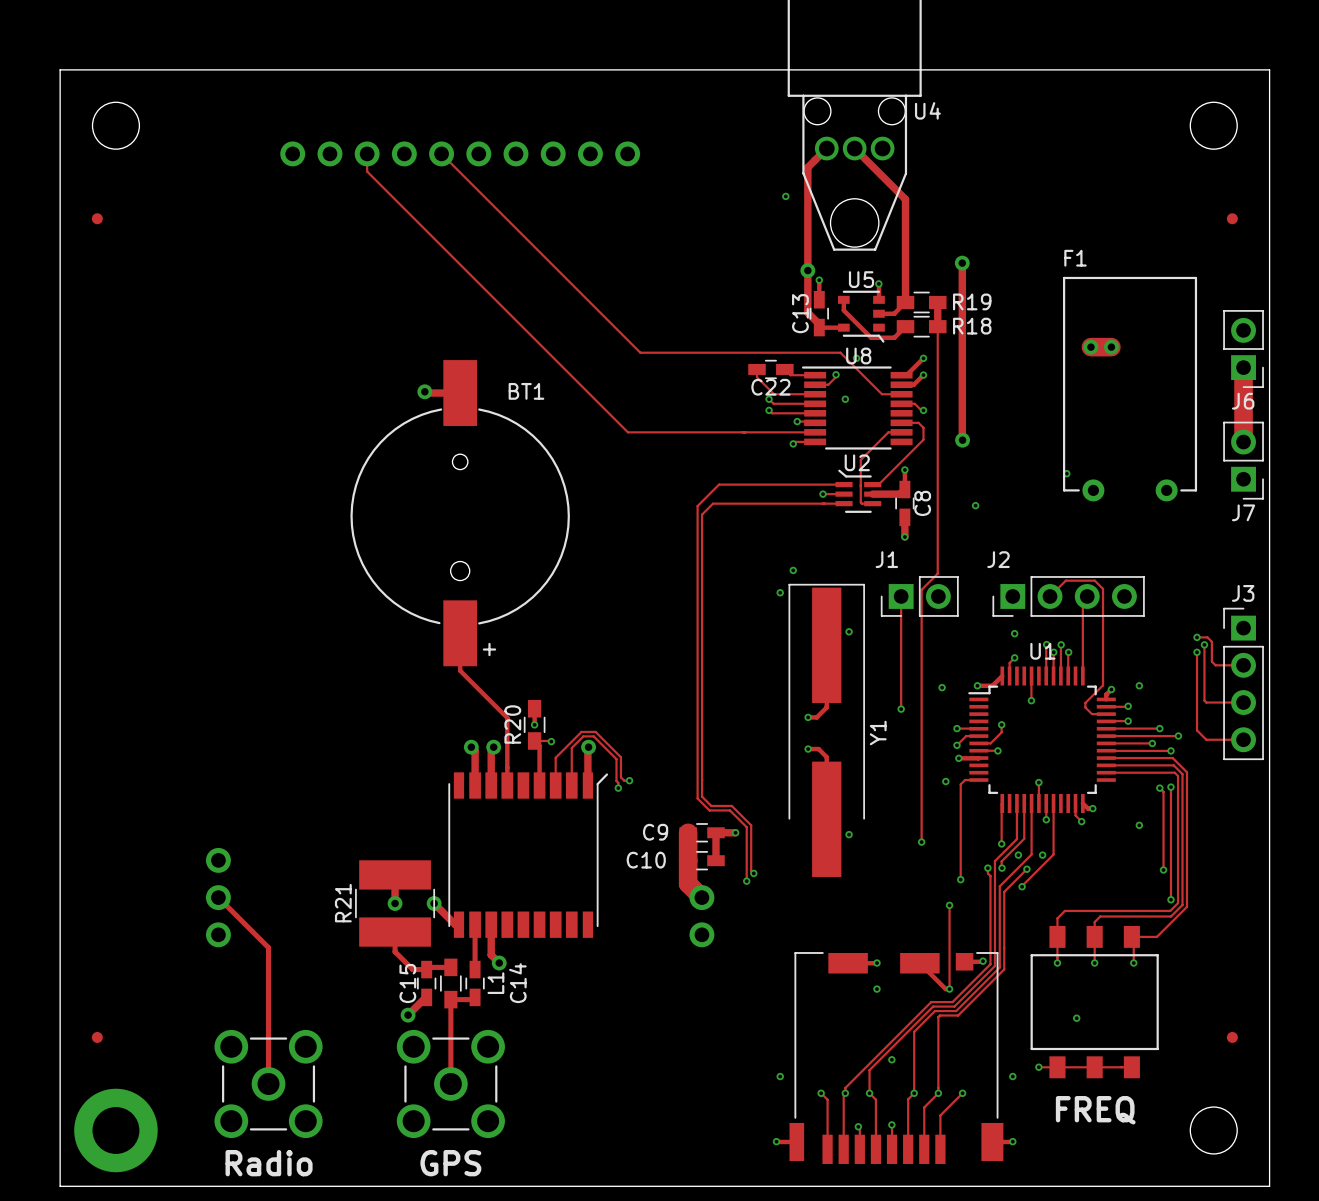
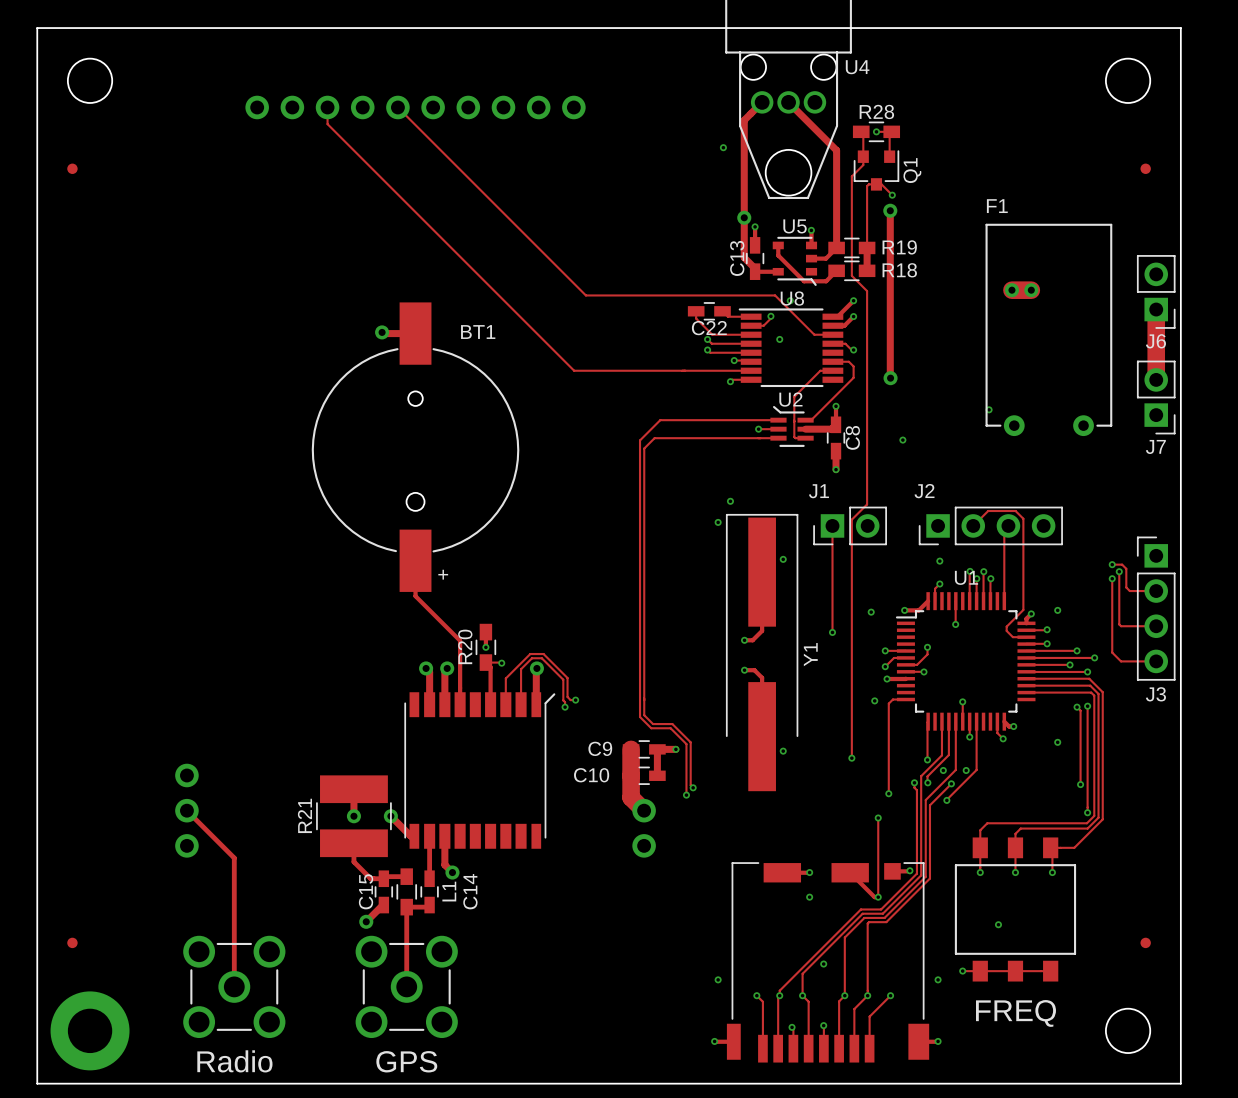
track: none -> (876, 131) (891, 131) (889, 133) (889, 156)
R28: none -> (876, 131)
via: none -> (876, 131)
Q1: none -> (876, 170)
track: none -> (892, 195) (881, 184) (868, 184) (867, 186) (867, 247)
via: none -> (892, 195)
track: (937, 326) (937, 348) -> (861, 131) (863, 133) (863, 165) (851, 176) (851, 275) (867, 291)
J3 name position: J3 (1243, 593) -> J3 (1155, 694)

